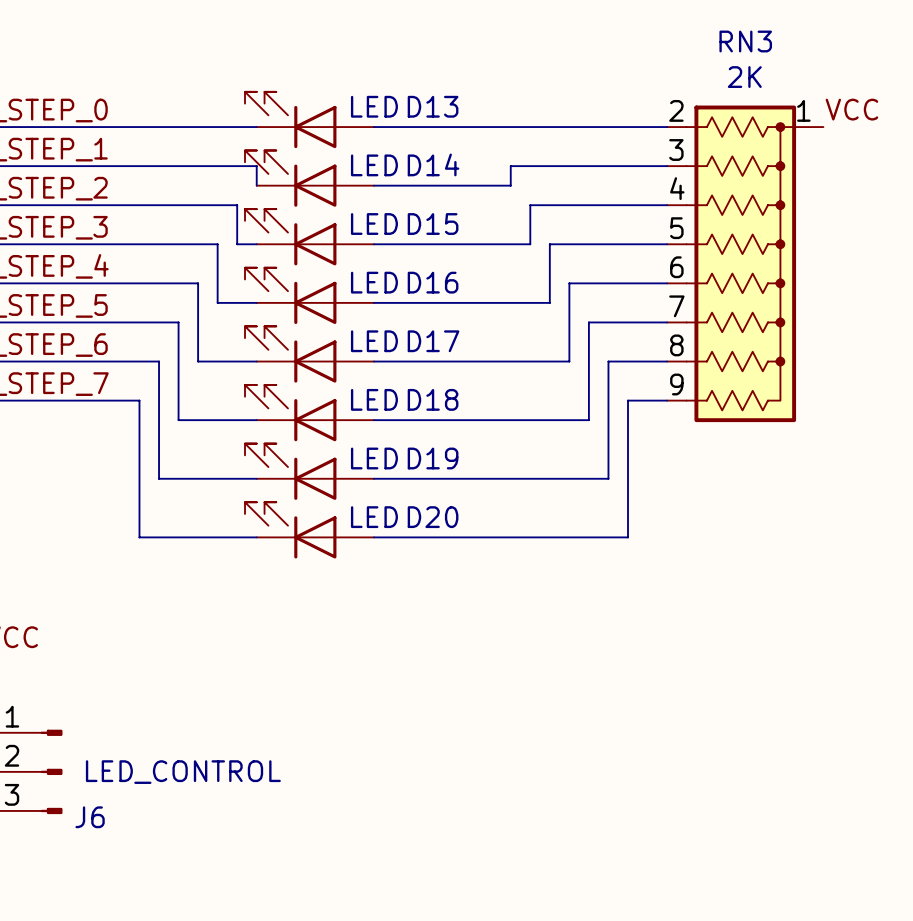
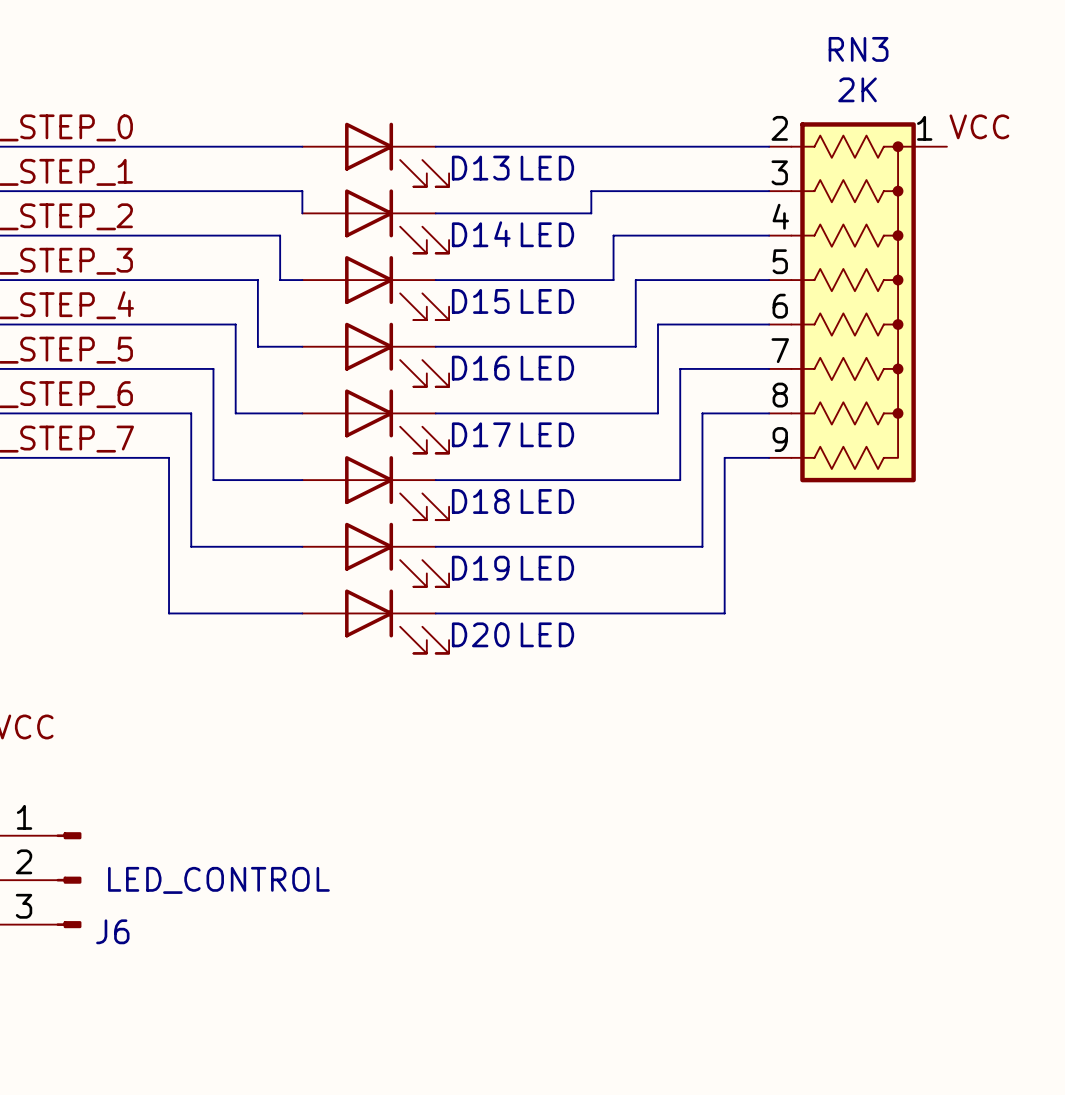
D13 value position: LED (374, 106) -> LED (547, 168)
D13 name position: D13 (433, 106) -> D13 (480, 168)
D13 rotation: 0° (290, 120) -> 180° (397, 154)
D14 name position: D14 (433, 164) -> D14 (481, 234)
D14 value position: LED (374, 165) -> LED (547, 234)
D14 rotation: 0° (290, 178) -> 180° (397, 221)
D15 value position: LED (374, 224) -> LED (547, 301)
D15 name position: D15 (433, 224) -> D15 (480, 301)
D15 rotation: 0° (290, 237) -> 180° (397, 288)
D16 value position: LED (374, 282) -> LED (547, 368)
D16 name position: D16 (433, 282) -> D16 (480, 368)
D16 rotation: 0° (290, 295) -> 180° (397, 354)
D17 value position: LED (374, 341) -> LED (547, 434)
D17 name position: D17 (433, 341) -> D17 (481, 434)
D17 rotation: 0° (290, 354) -> 180° (397, 421)
D18 value position: LED (374, 399) -> LED (547, 501)
D18 name position: D18 (433, 399) -> D18 (480, 501)
D18 rotation: 0° (290, 413) -> 180° (397, 488)
D19 value position: LED (374, 458) -> LED (547, 568)
D19 name position: D19 (433, 458) -> D19 (480, 568)
D19 rotation: 0° (290, 471) -> 180° (397, 554)
D20 value position: LED (374, 517) -> LED (547, 634)
D20 name position: D20 (433, 517) -> D20 (480, 634)
D20 rotation: 0° (290, 530) -> 180° (397, 621)

